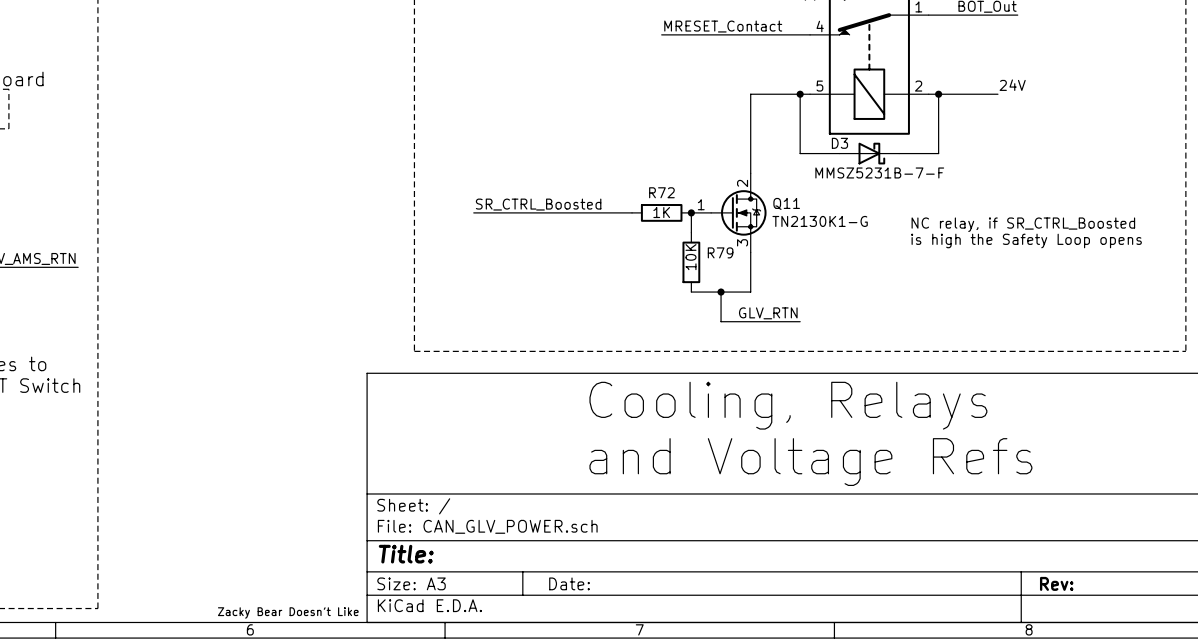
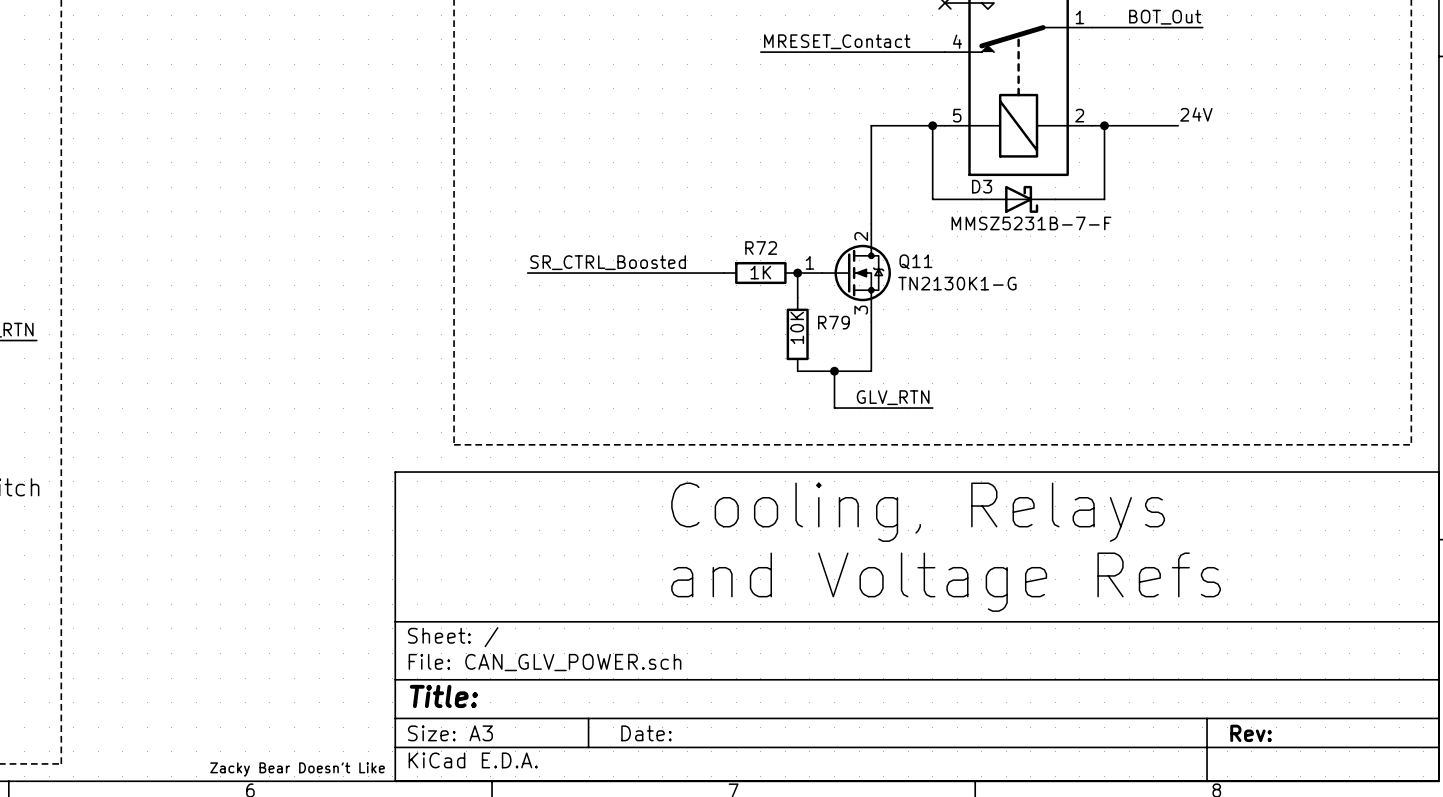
text: NC relay, if SR_CTRL_Boosted (1023, 224) -> none
text: is high the Safety Loop opens (1026, 240) -> none

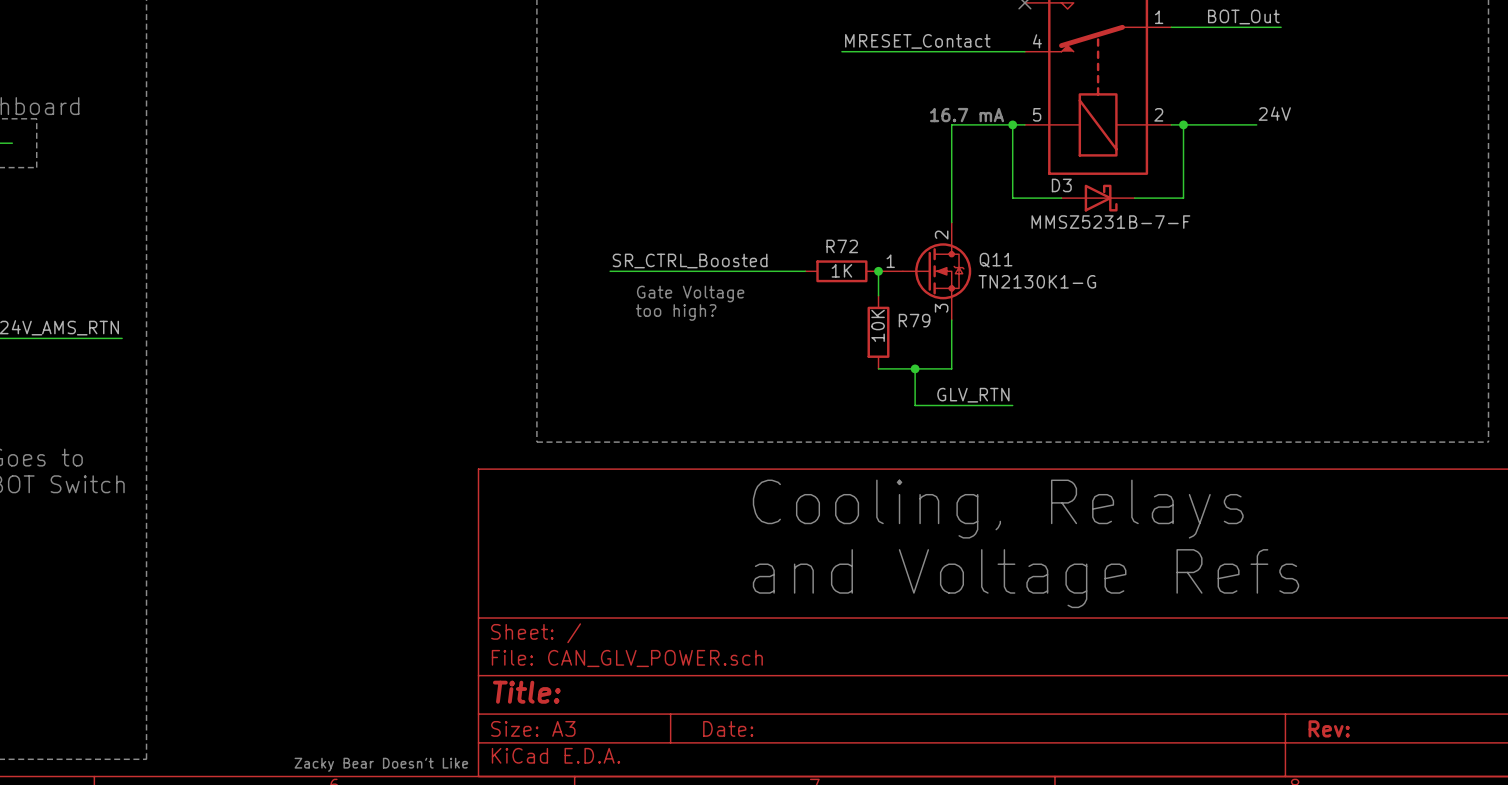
text: none -> 16.7 mA (967, 115)
text: none -> Gate Voltage (690, 294)
text: none -> too high? (676, 312)

